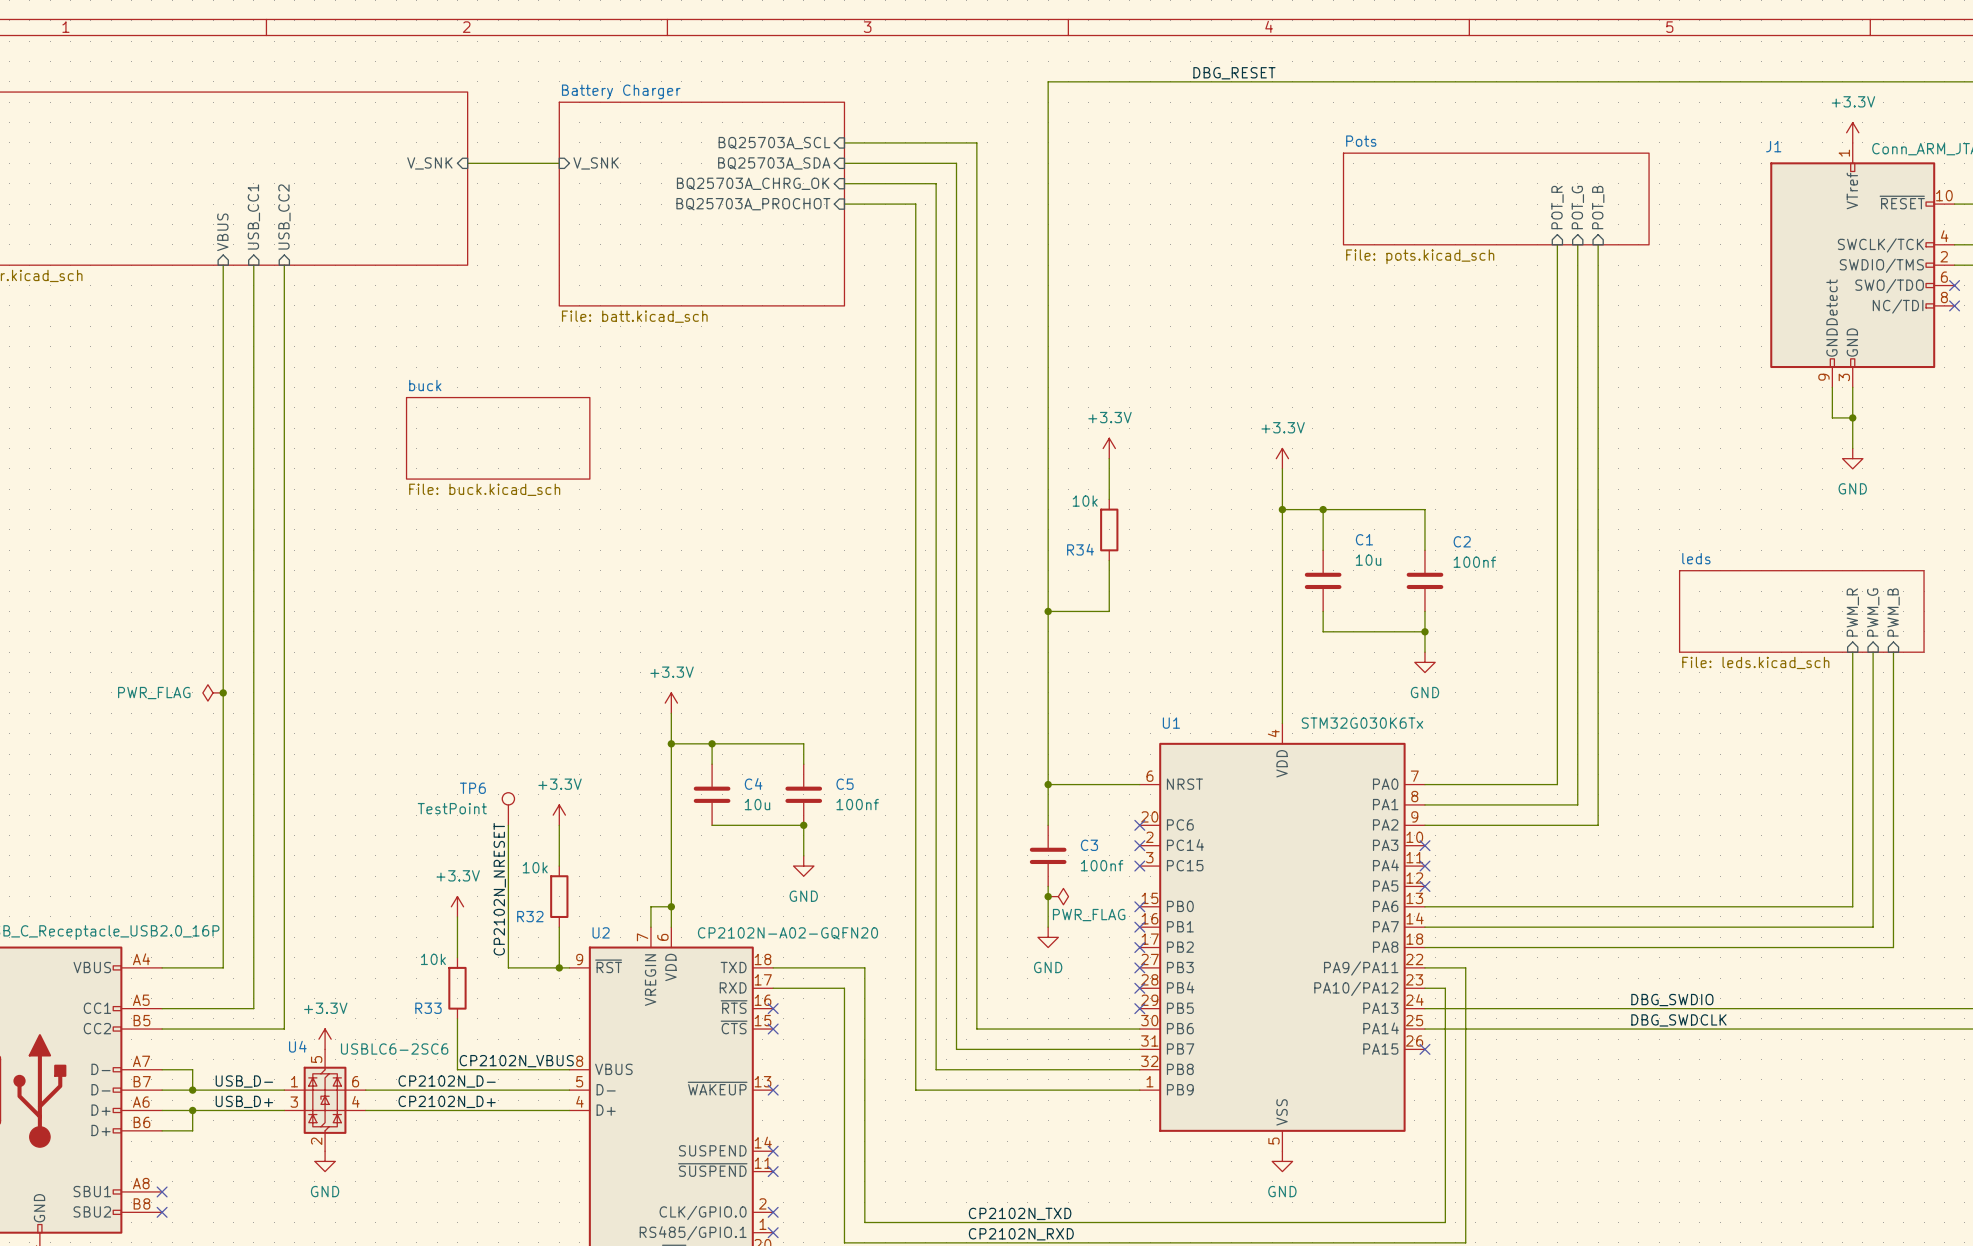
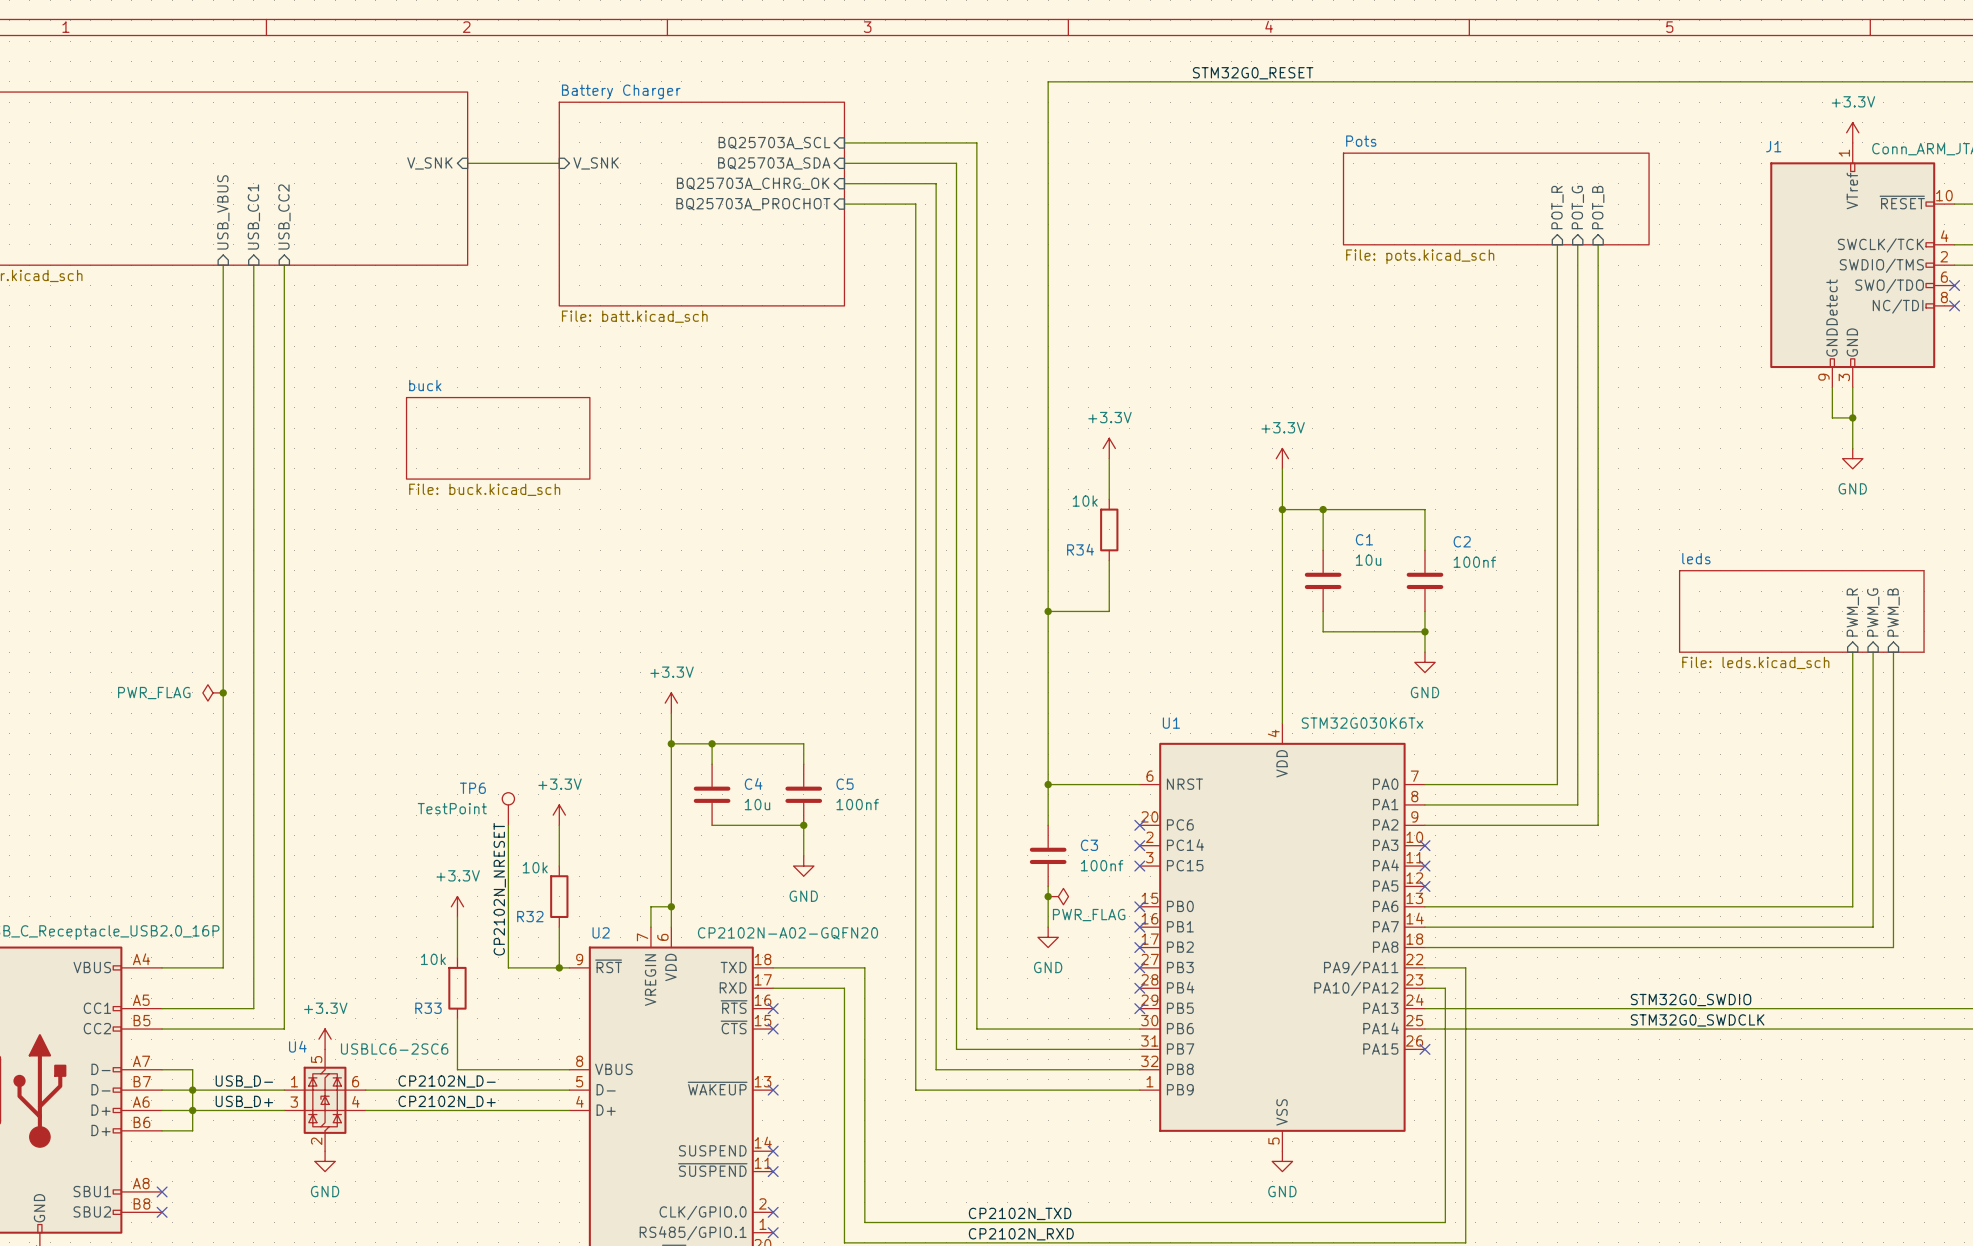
label: DBG_RESET (1234, 73) -> STM32G0_RESET (1253, 73)
sheet pin: VBUS (222, 232) -> USB_VBUS (223, 212)
label: DBG_SWDIO (1672, 1000) -> STM32G0_SWDIO (1691, 1000)
label: DBG_SWDCLK (1678, 1020) -> STM32G0_SWDCLK (1697, 1020)
label: CP2102N_VBUS (516, 1061) -> none
wire: none -> (192, 1090) (192, 1110)

